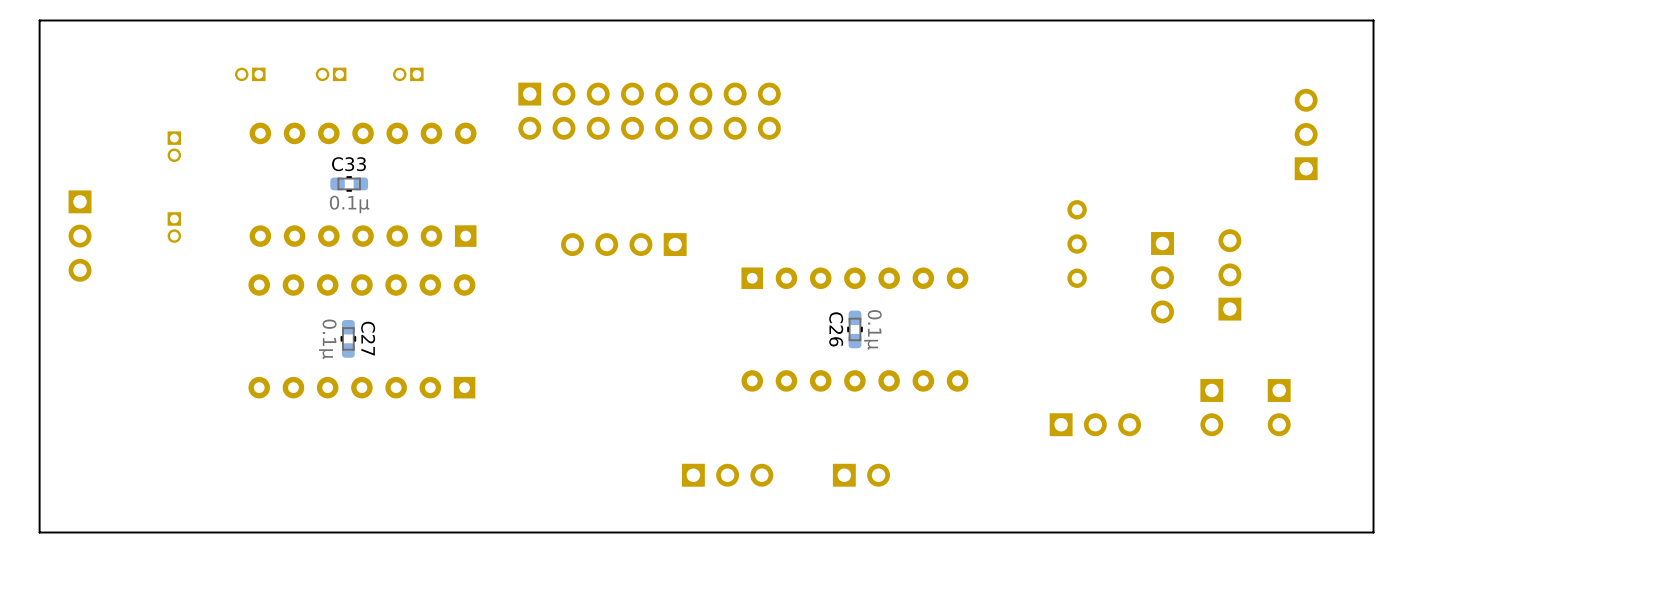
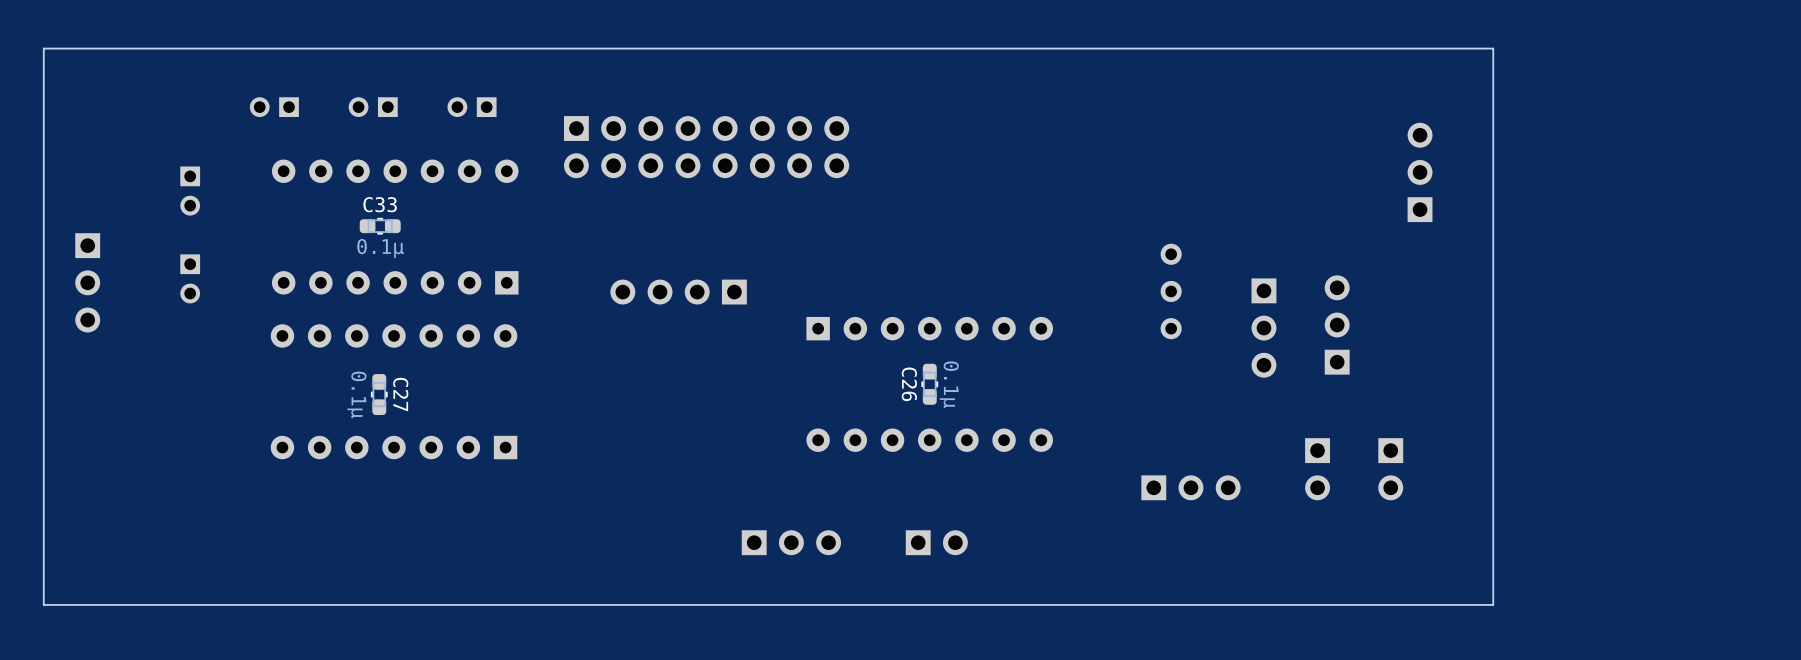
part footprint: [234, 67, 266, 82] -> [249, 97, 299, 118]
part footprint: [315, 67, 347, 82] -> [348, 97, 398, 118]
part: (408, 74) -> none
part: none -> (472, 107)
part footprint: [167, 131, 182, 162] -> [180, 166, 201, 216]
part footprint: [167, 212, 182, 243] -> [180, 254, 201, 304]

